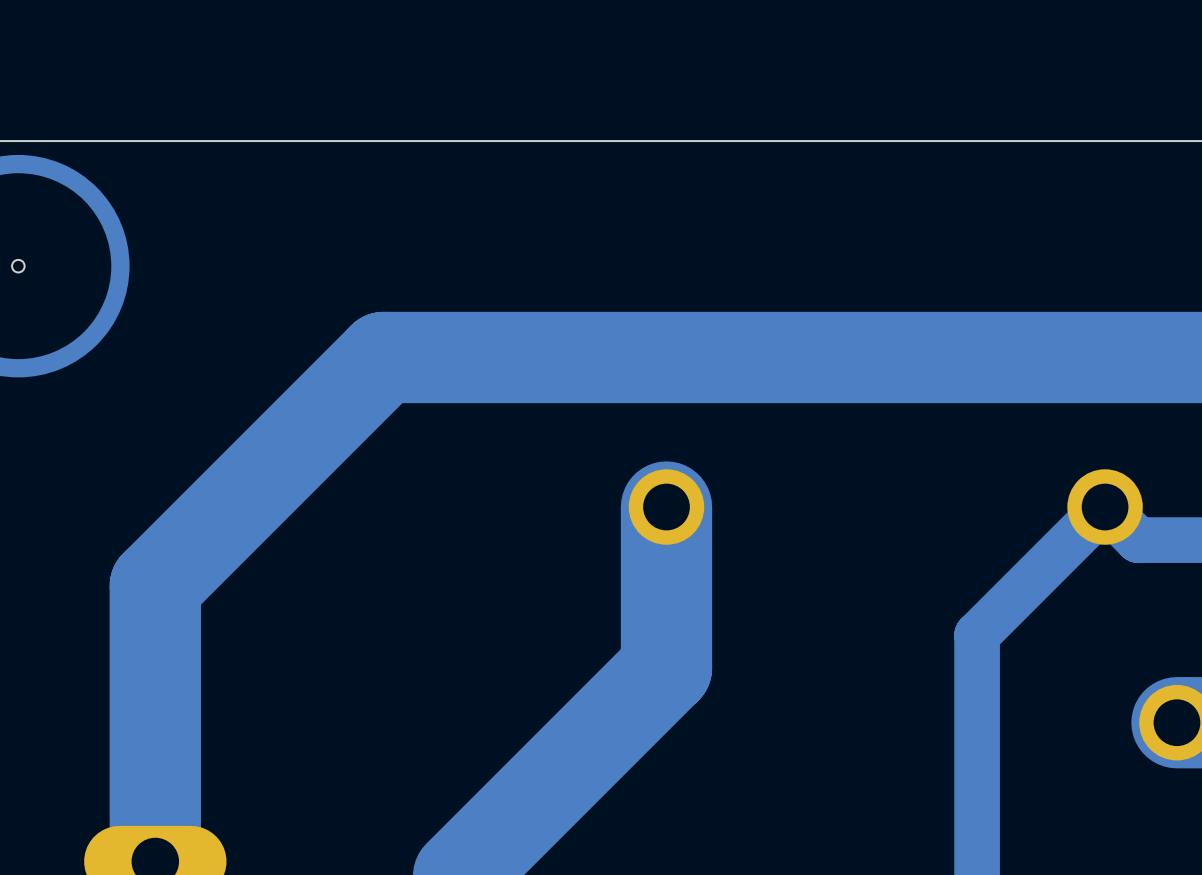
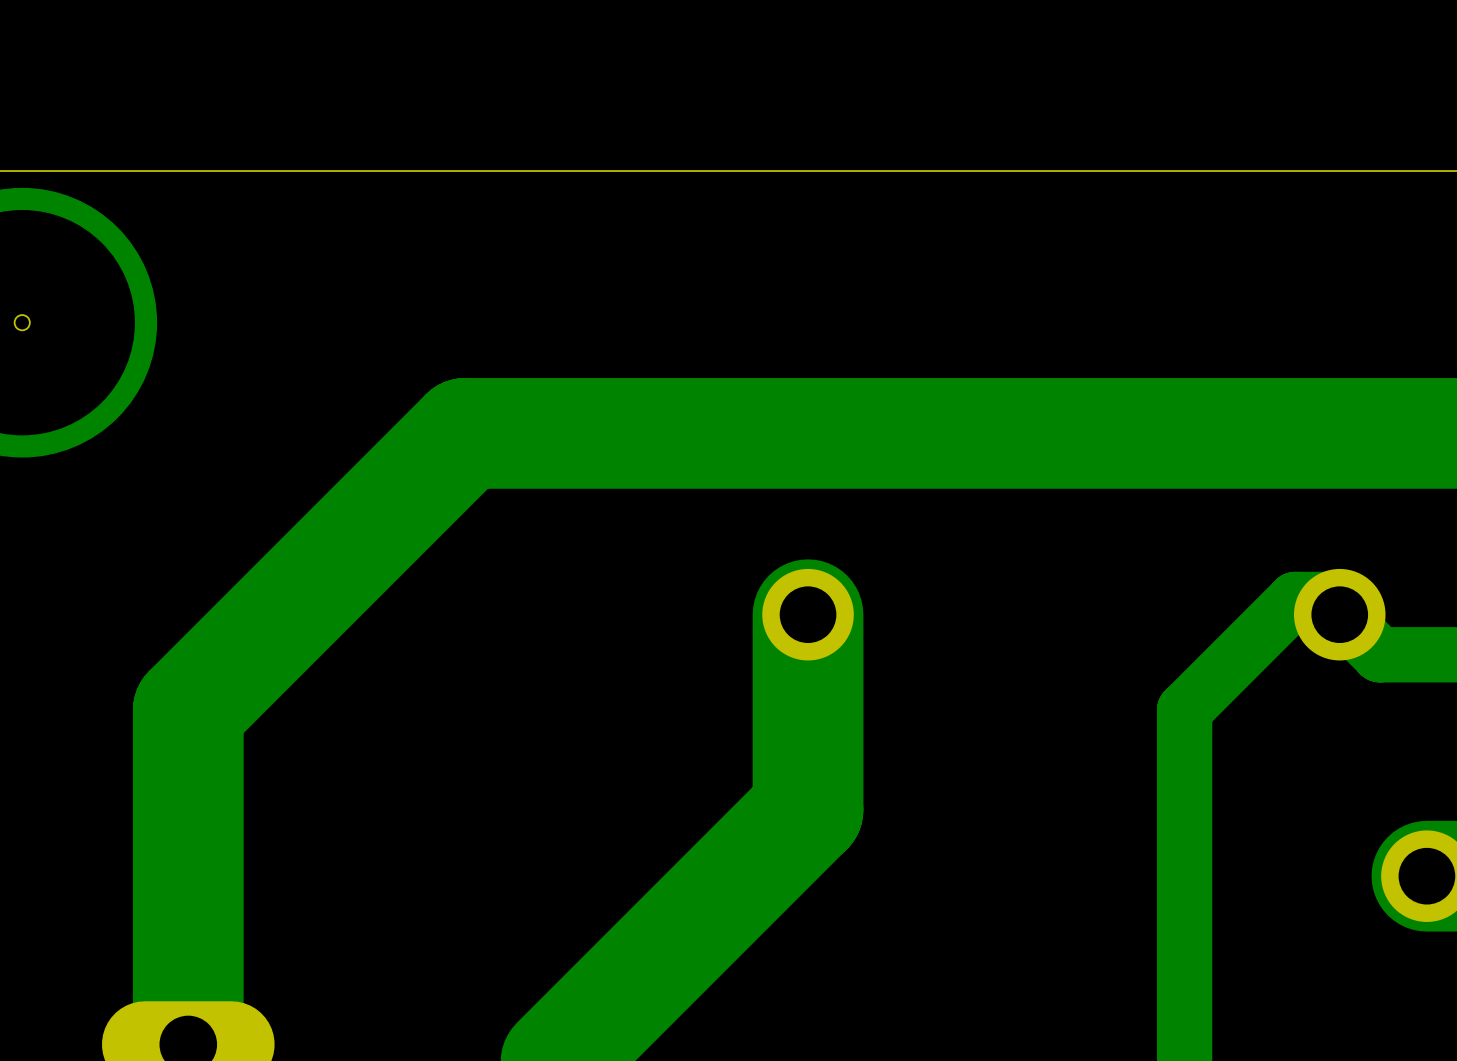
track: (1105, 507) (977, 635) -> (1339, 614) (1324, 599) (1295, 599) (1184, 710) (1184, 769)

